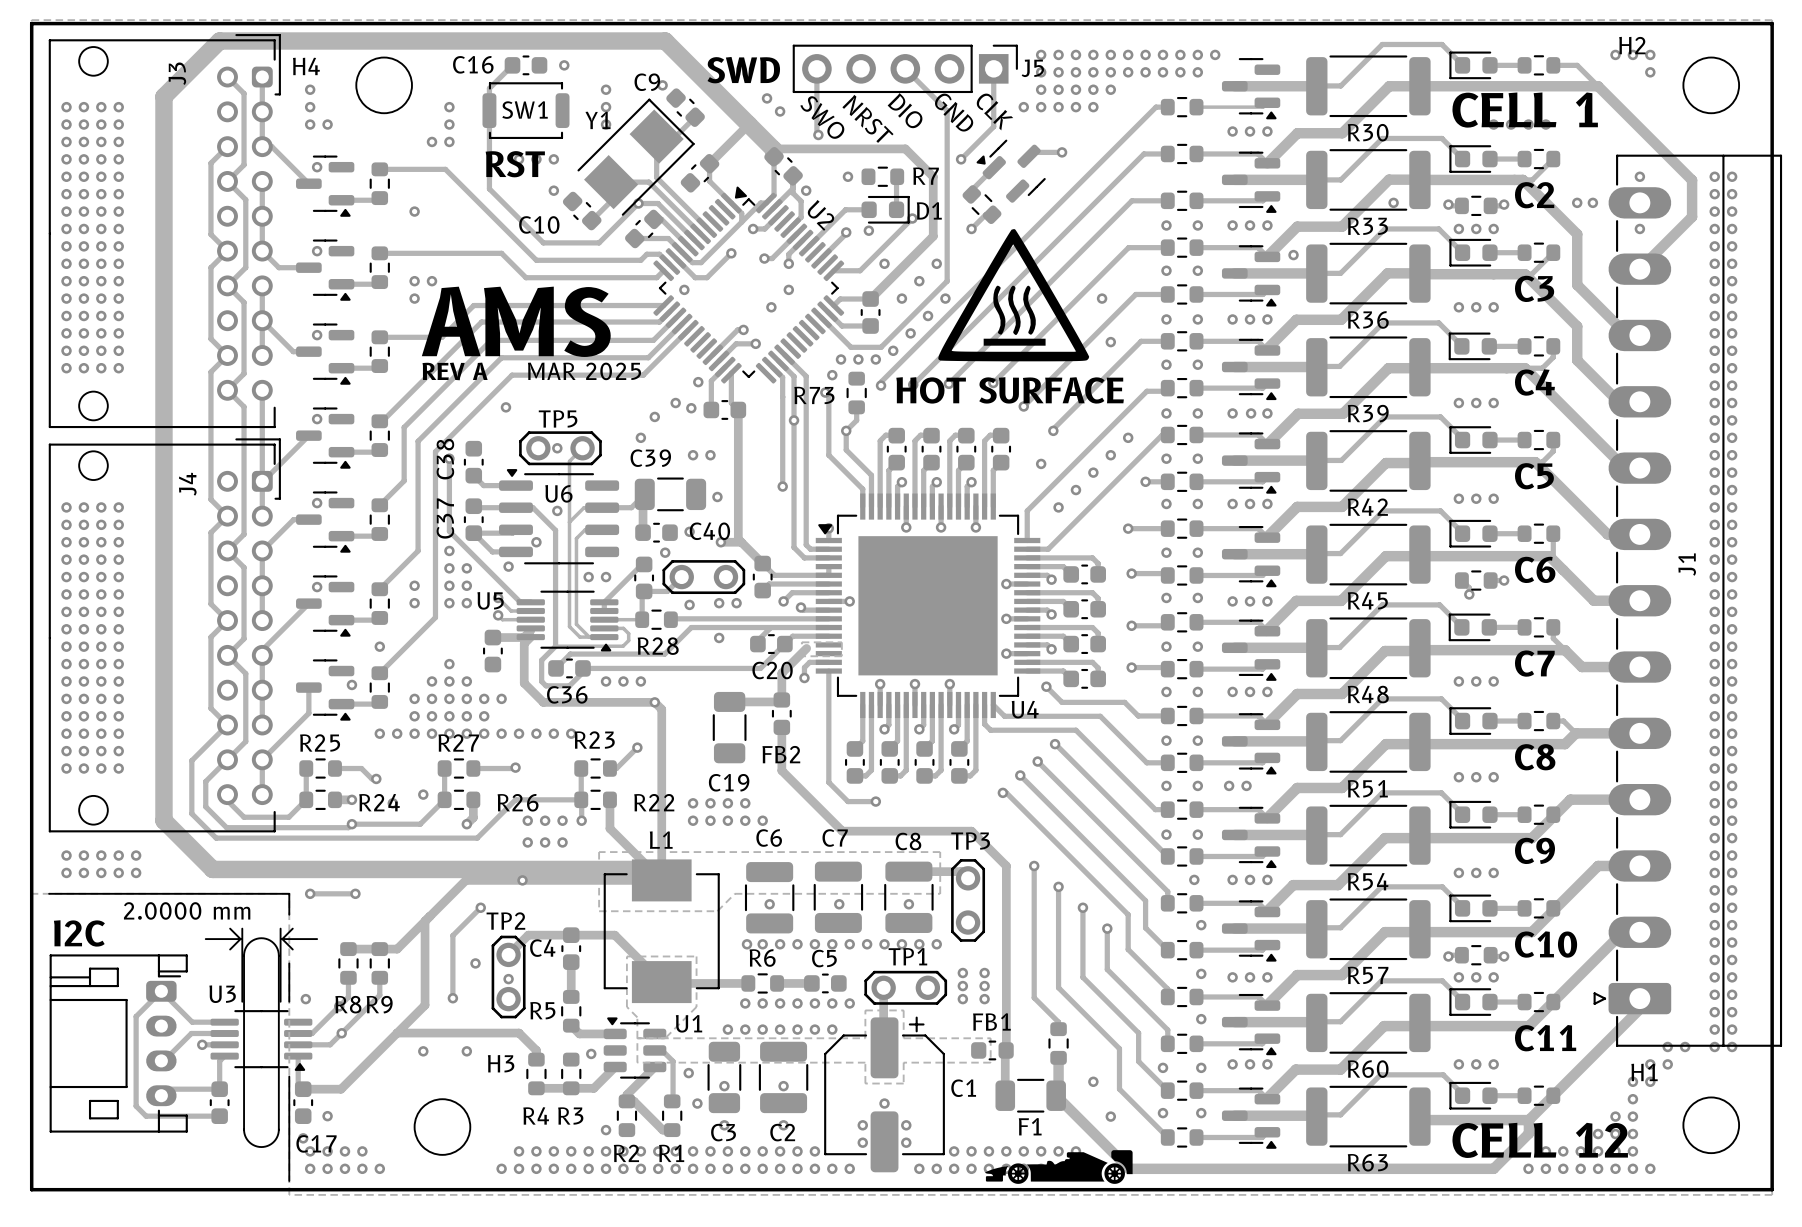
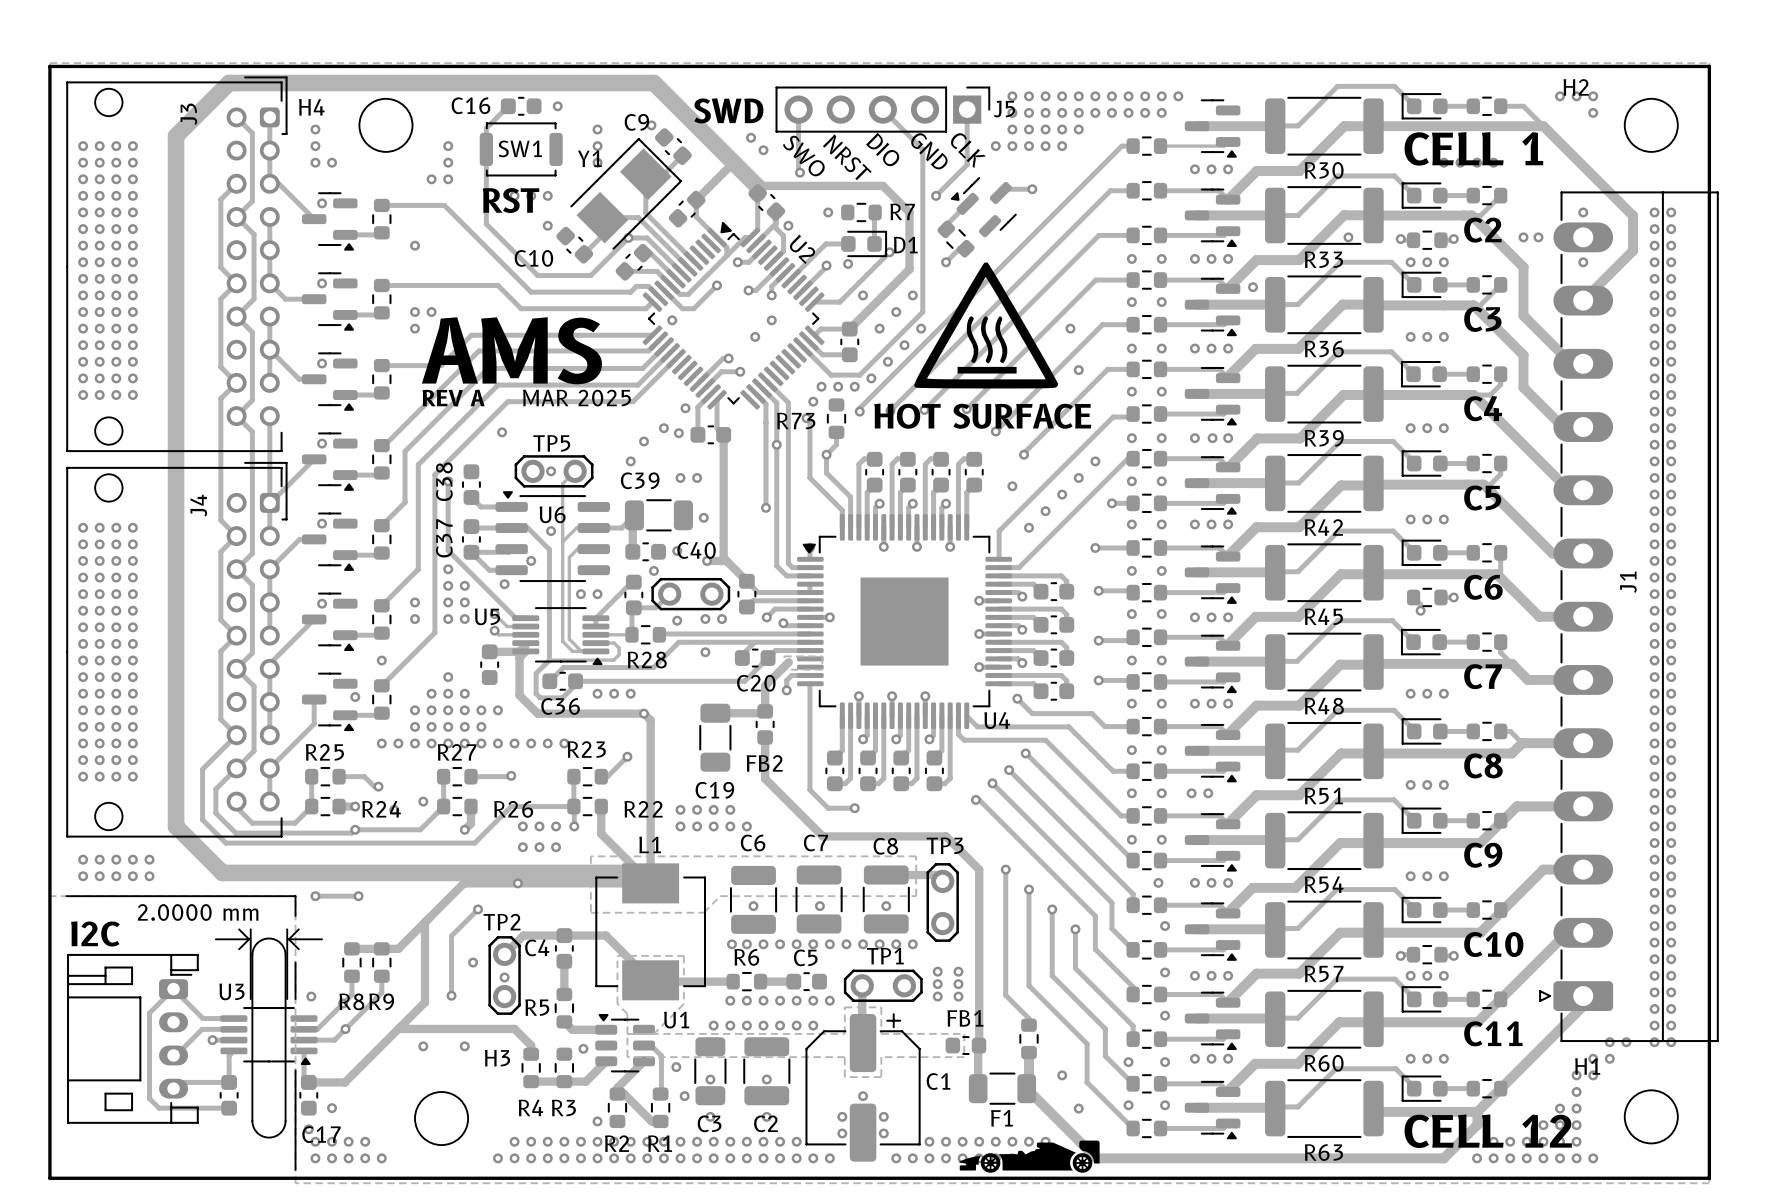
U4 footprint: [815, 493, 1041, 719] -> [797, 514, 1012, 729]

